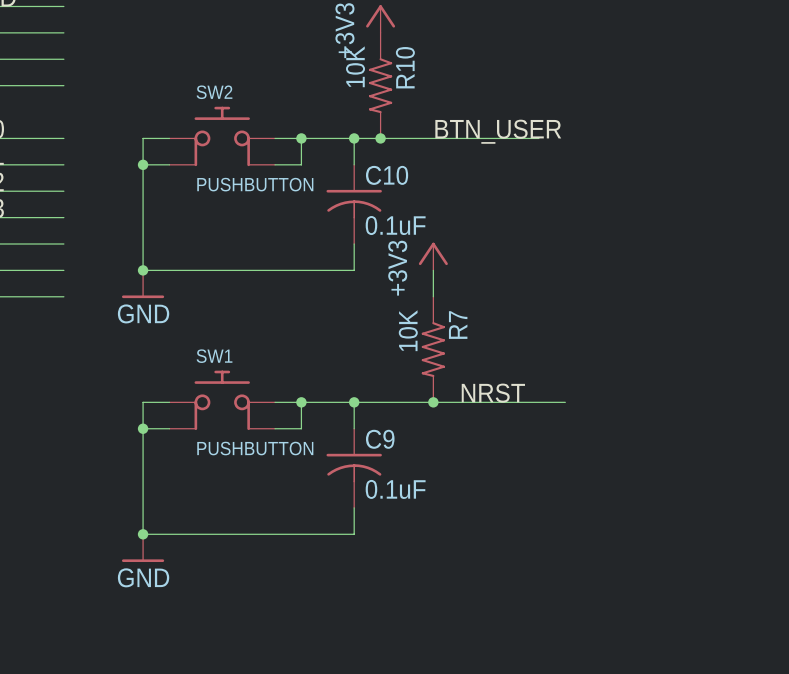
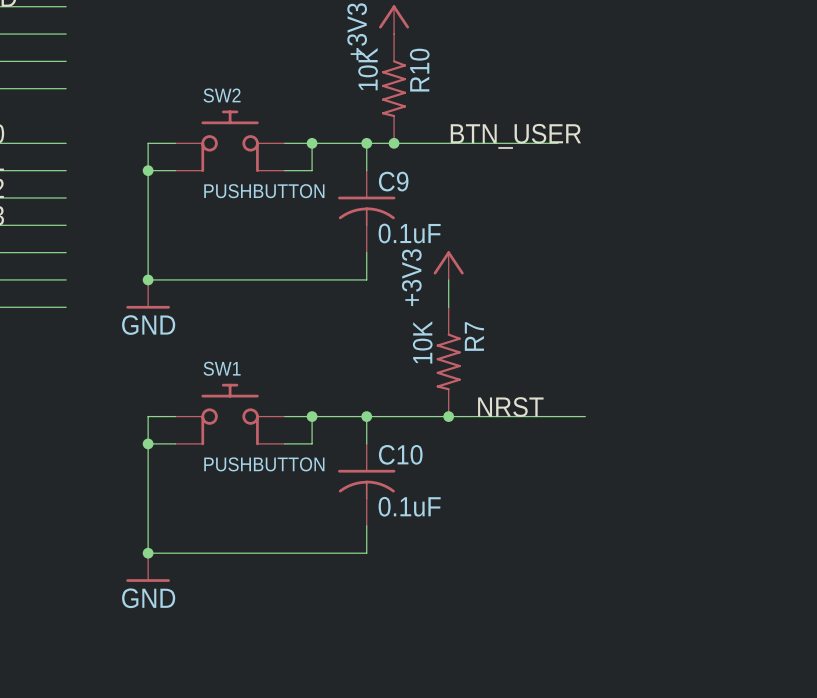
C10 symbol: [326, 164, 382, 245] -> [338, 443, 396, 526]
C9 symbol: [326, 428, 382, 508] -> [338, 170, 396, 253]

